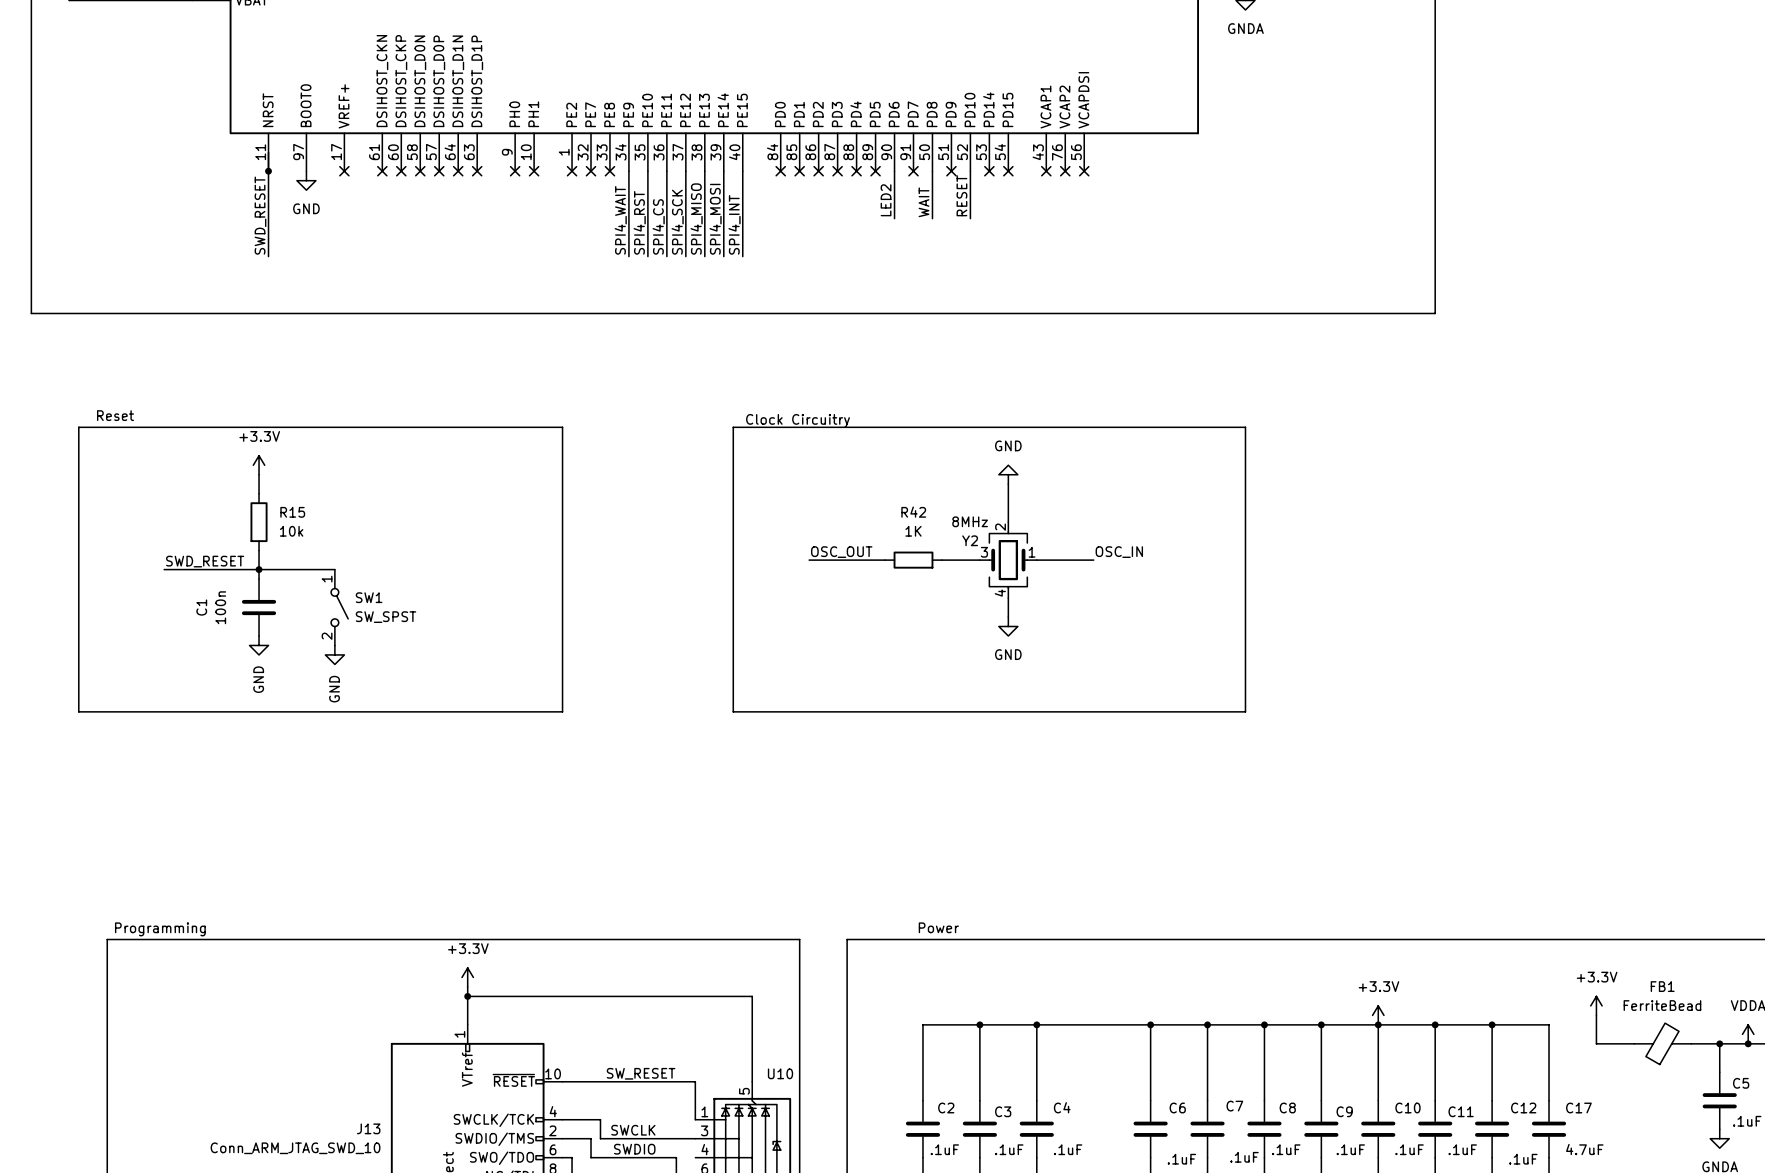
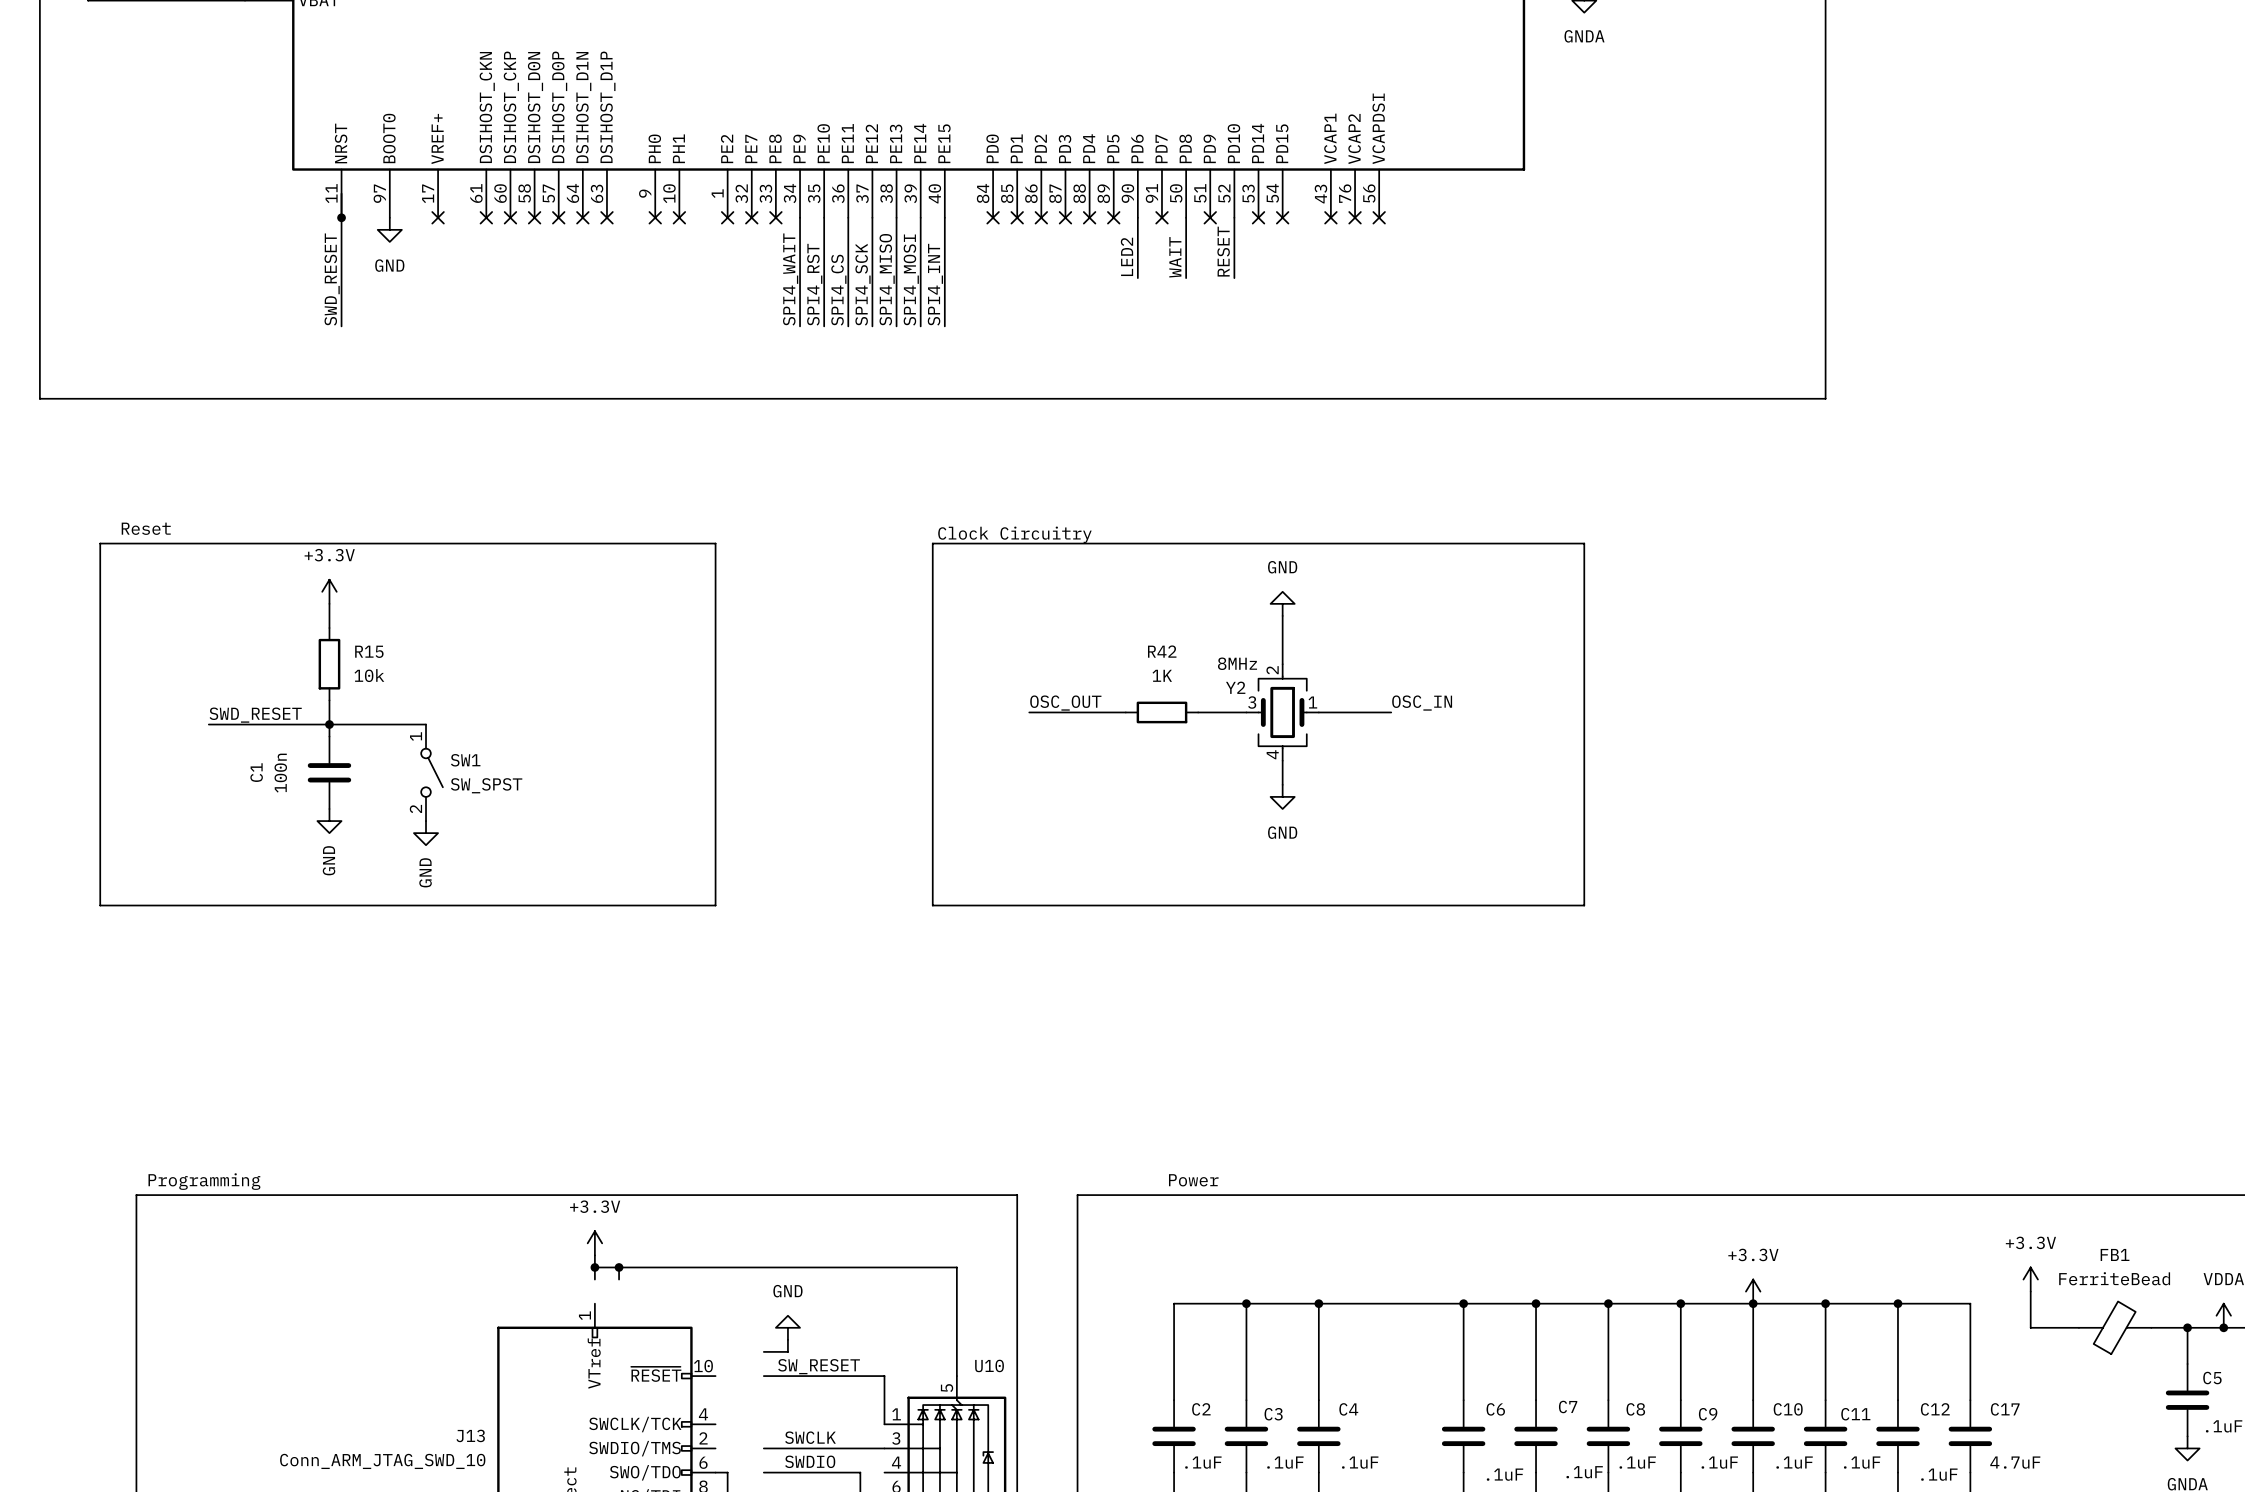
wire: none -> (619, 1267) (619, 1279)
junction: none -> (619, 1267)
wire: (467, 1005) (467, 1024) -> none
power symbol: none -> GND (787, 1327)
wire: none -> (787, 1339) (787, 1351) (763, 1351)
wire: (562, 1081) (600, 1081) -> none
wire: (562, 1119) (600, 1119) (600, 1138) -> none
wire: (562, 1138) (591, 1138) (591, 1157) (600, 1157) -> none

